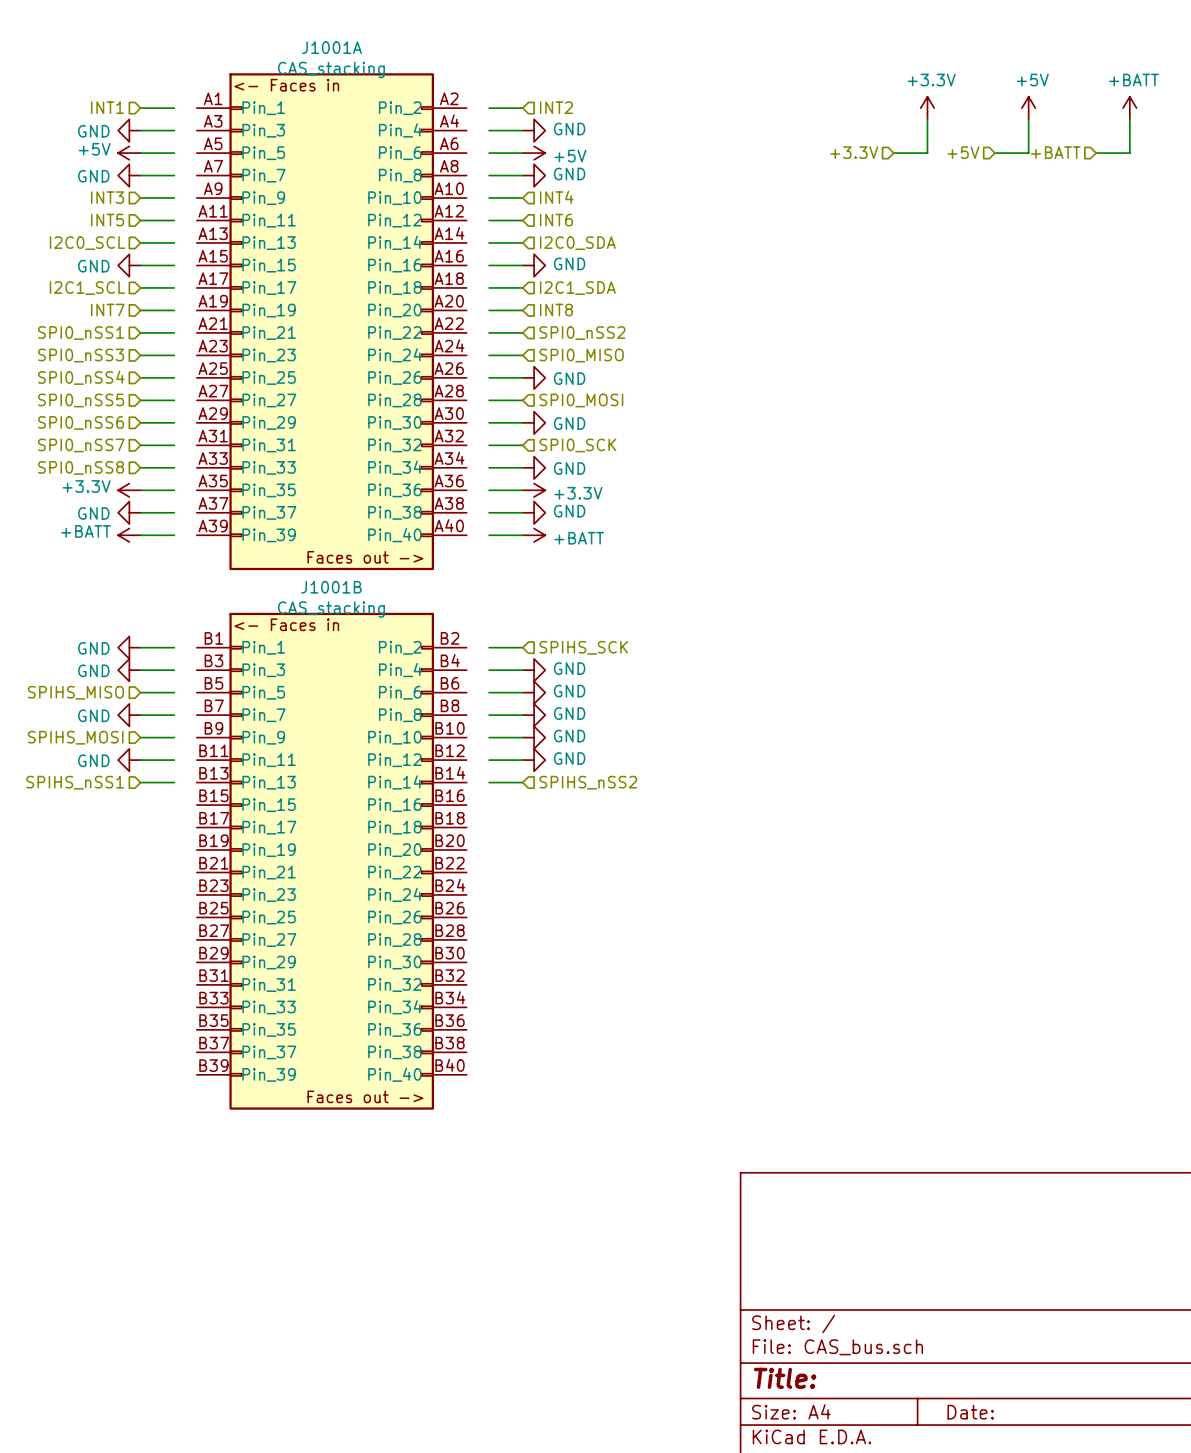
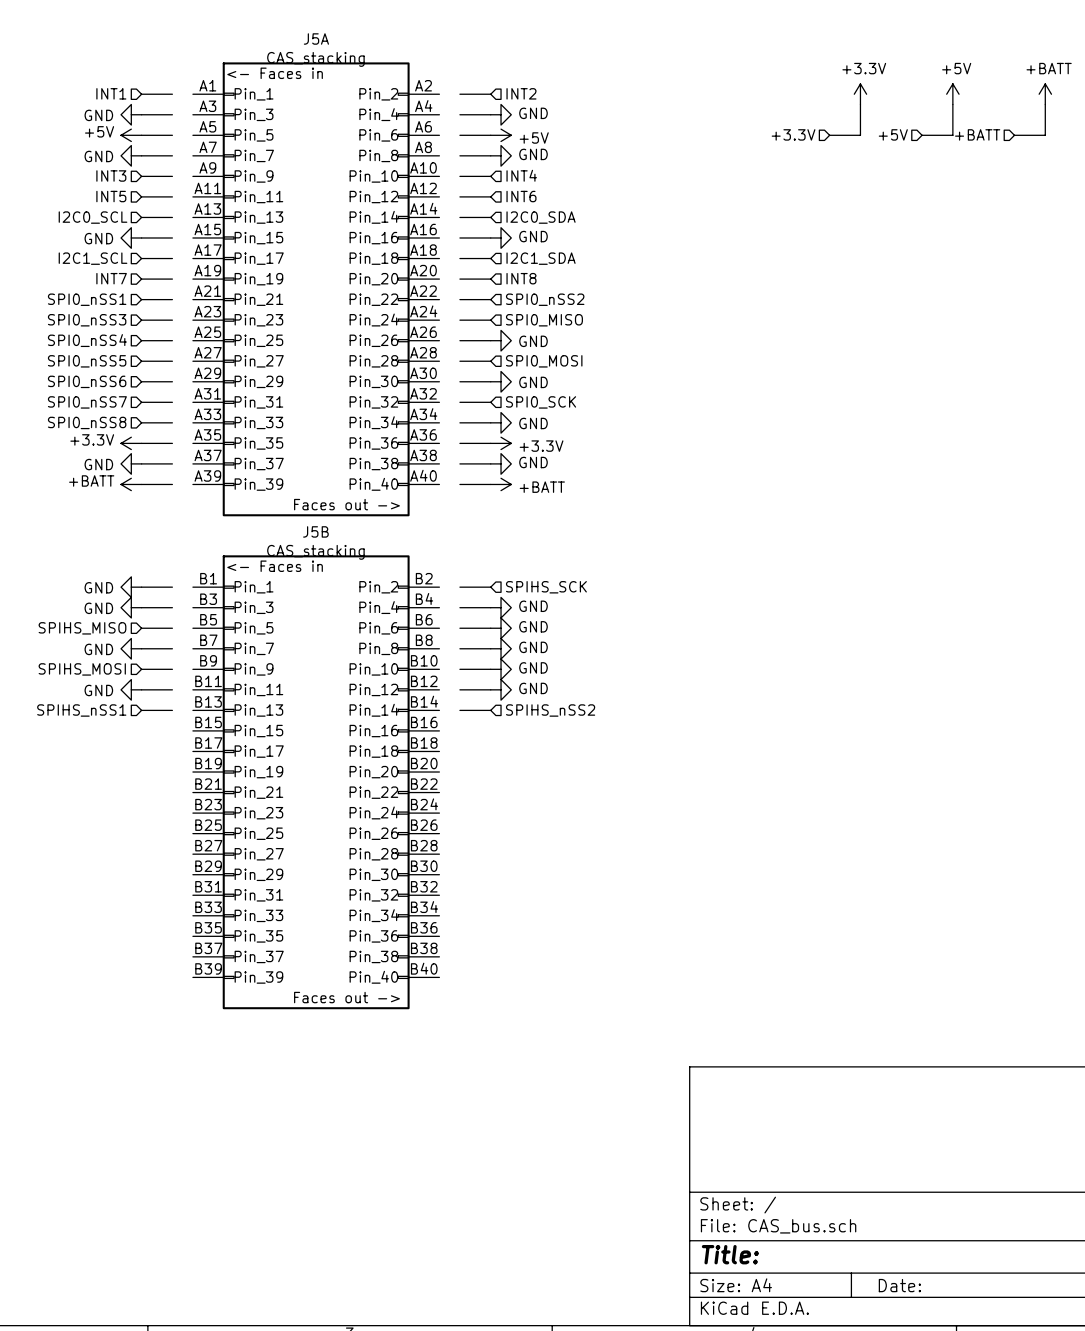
J1001A name: J1001A (331, 47) -> J5A (316, 39)
J1001B name: J1001B (331, 587) -> J5B (315, 531)

